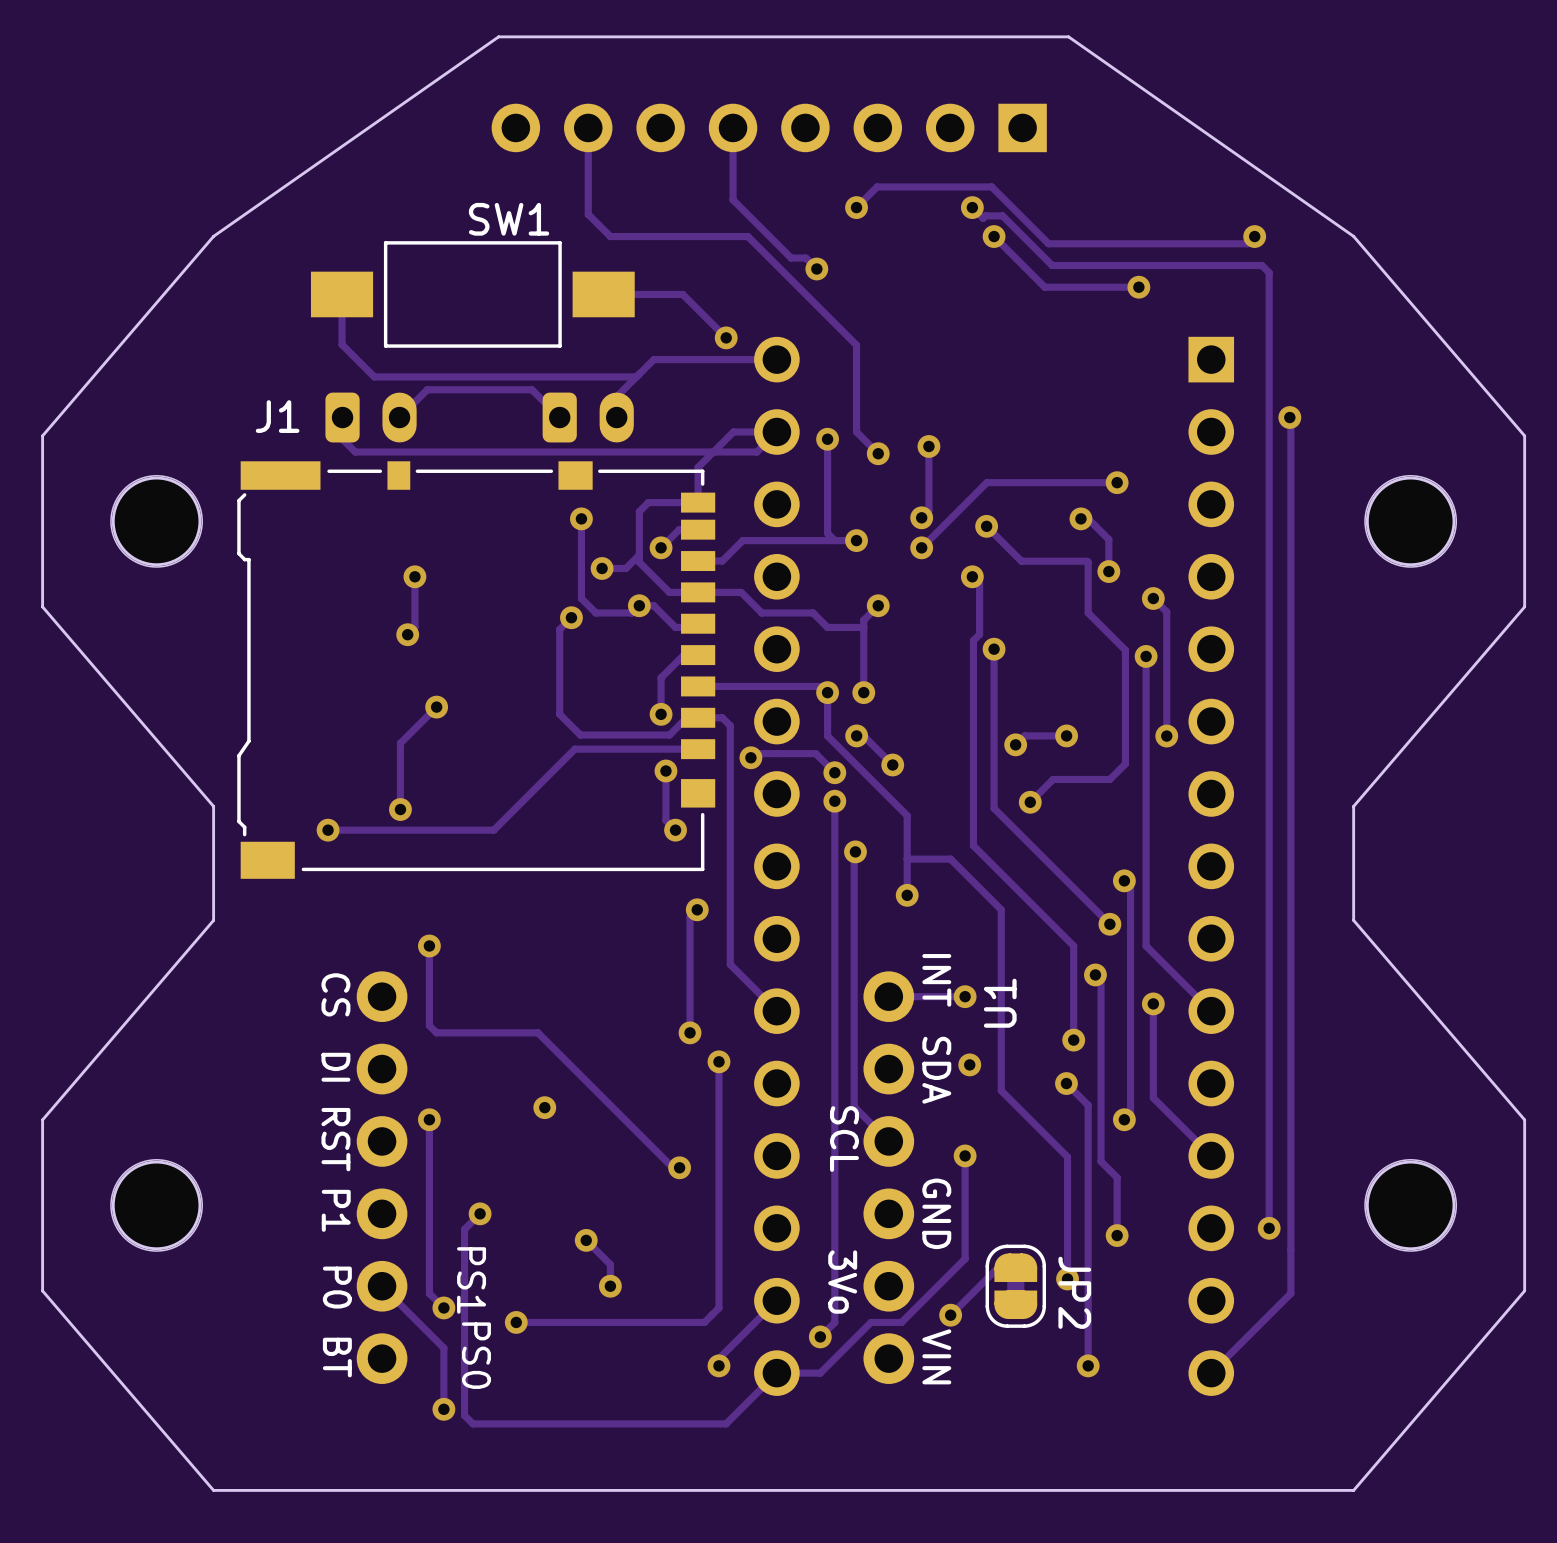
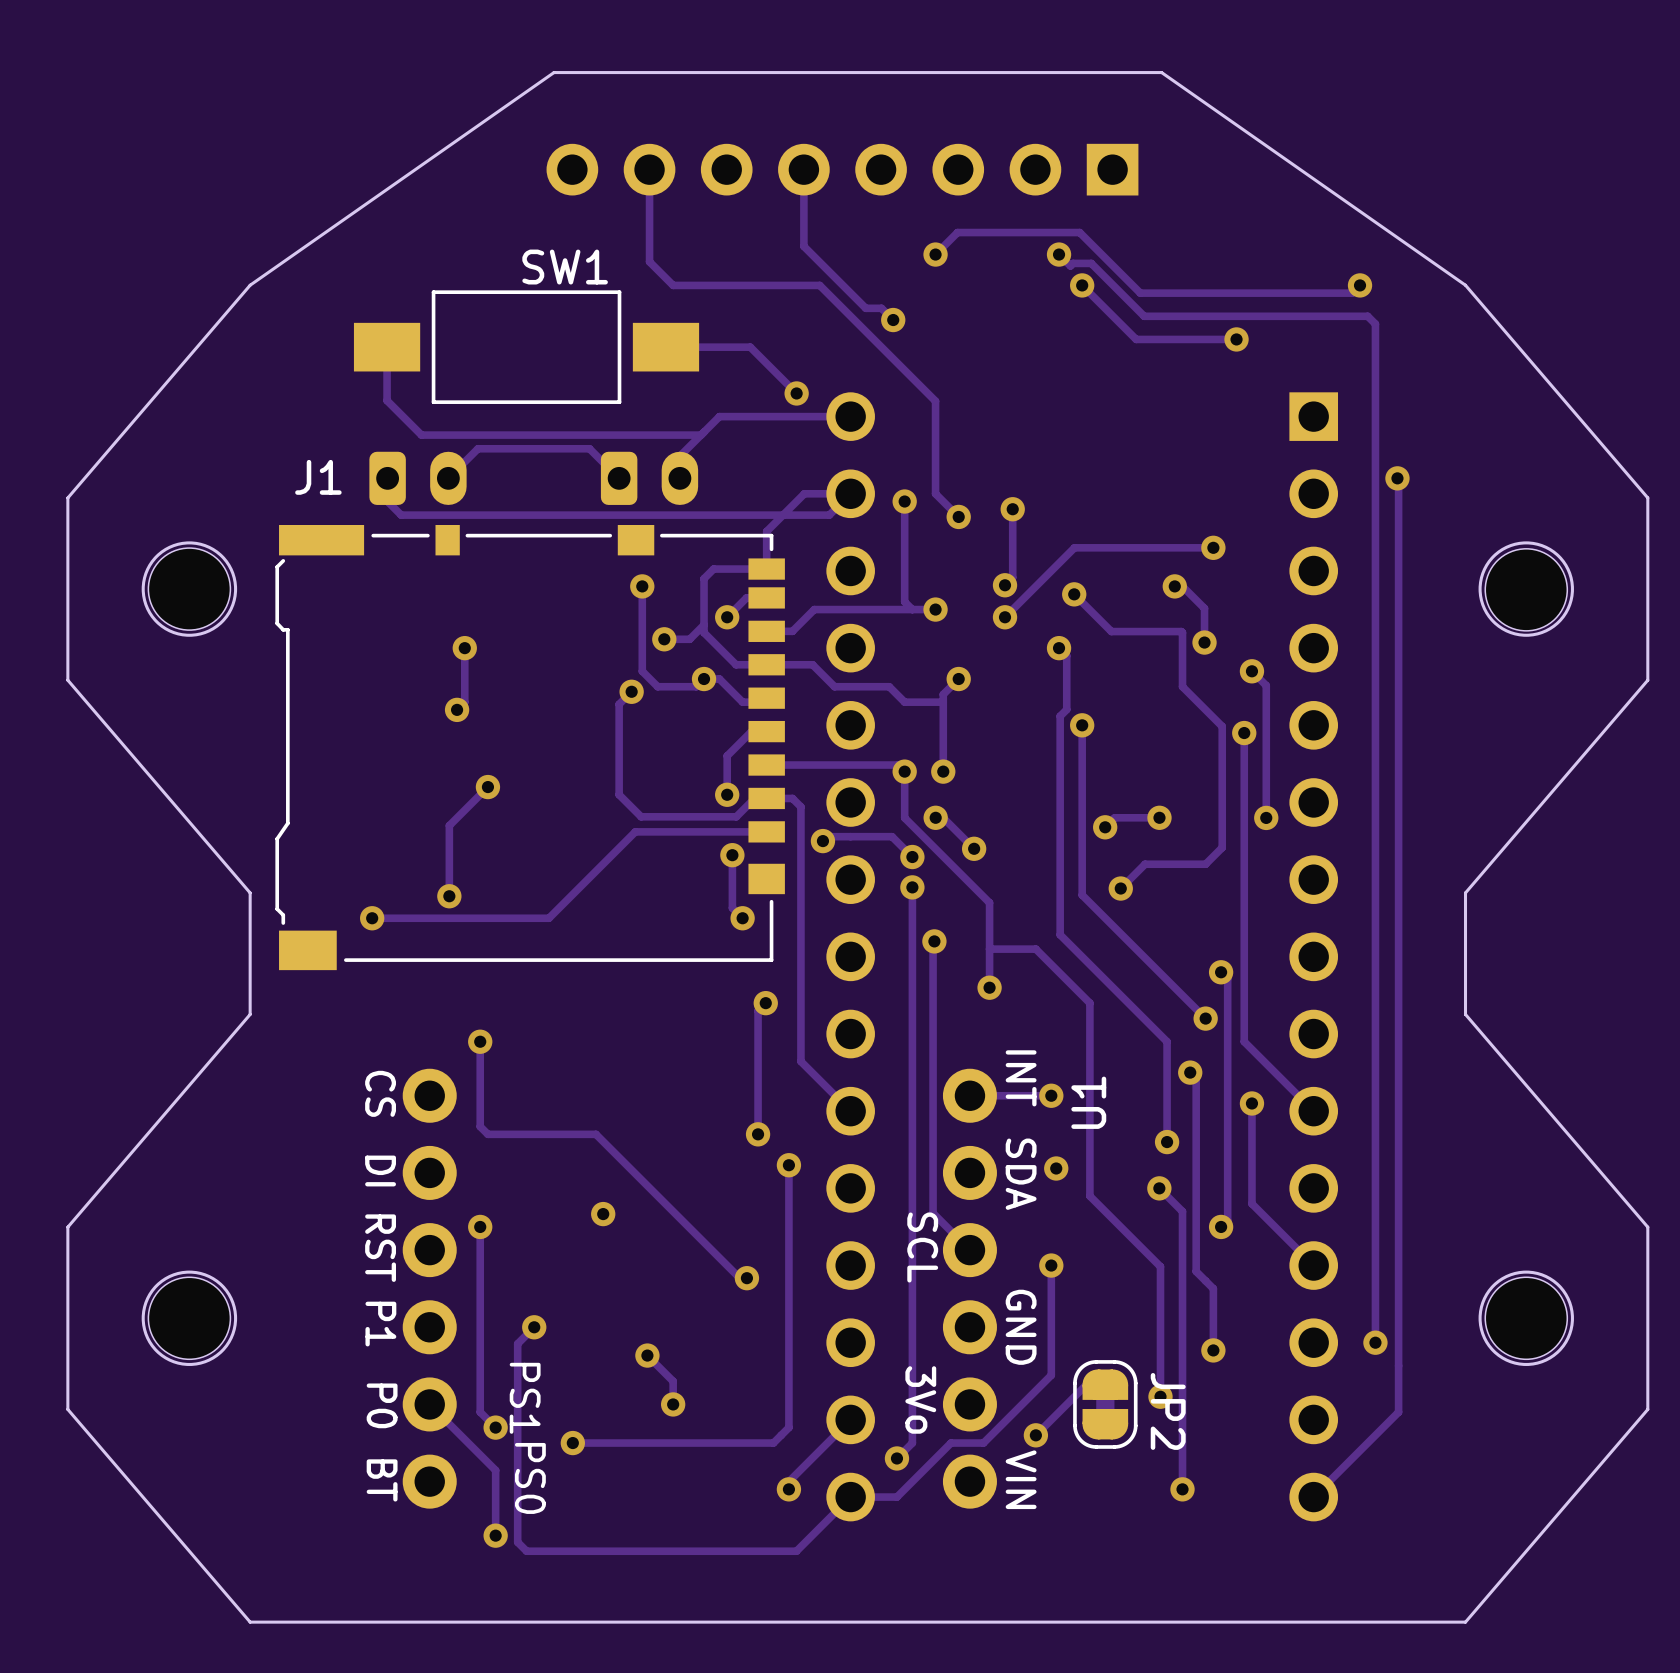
part footprint: [110, 475, 203, 567] -> [148, 548, 231, 631]
part footprint: [1365, 475, 1457, 567] -> [1485, 548, 1568, 631]
part footprint: [110, 1159, 203, 1252] -> [148, 1277, 231, 1360]
part footprint: [1365, 1159, 1457, 1252] -> [1485, 1277, 1568, 1360]

